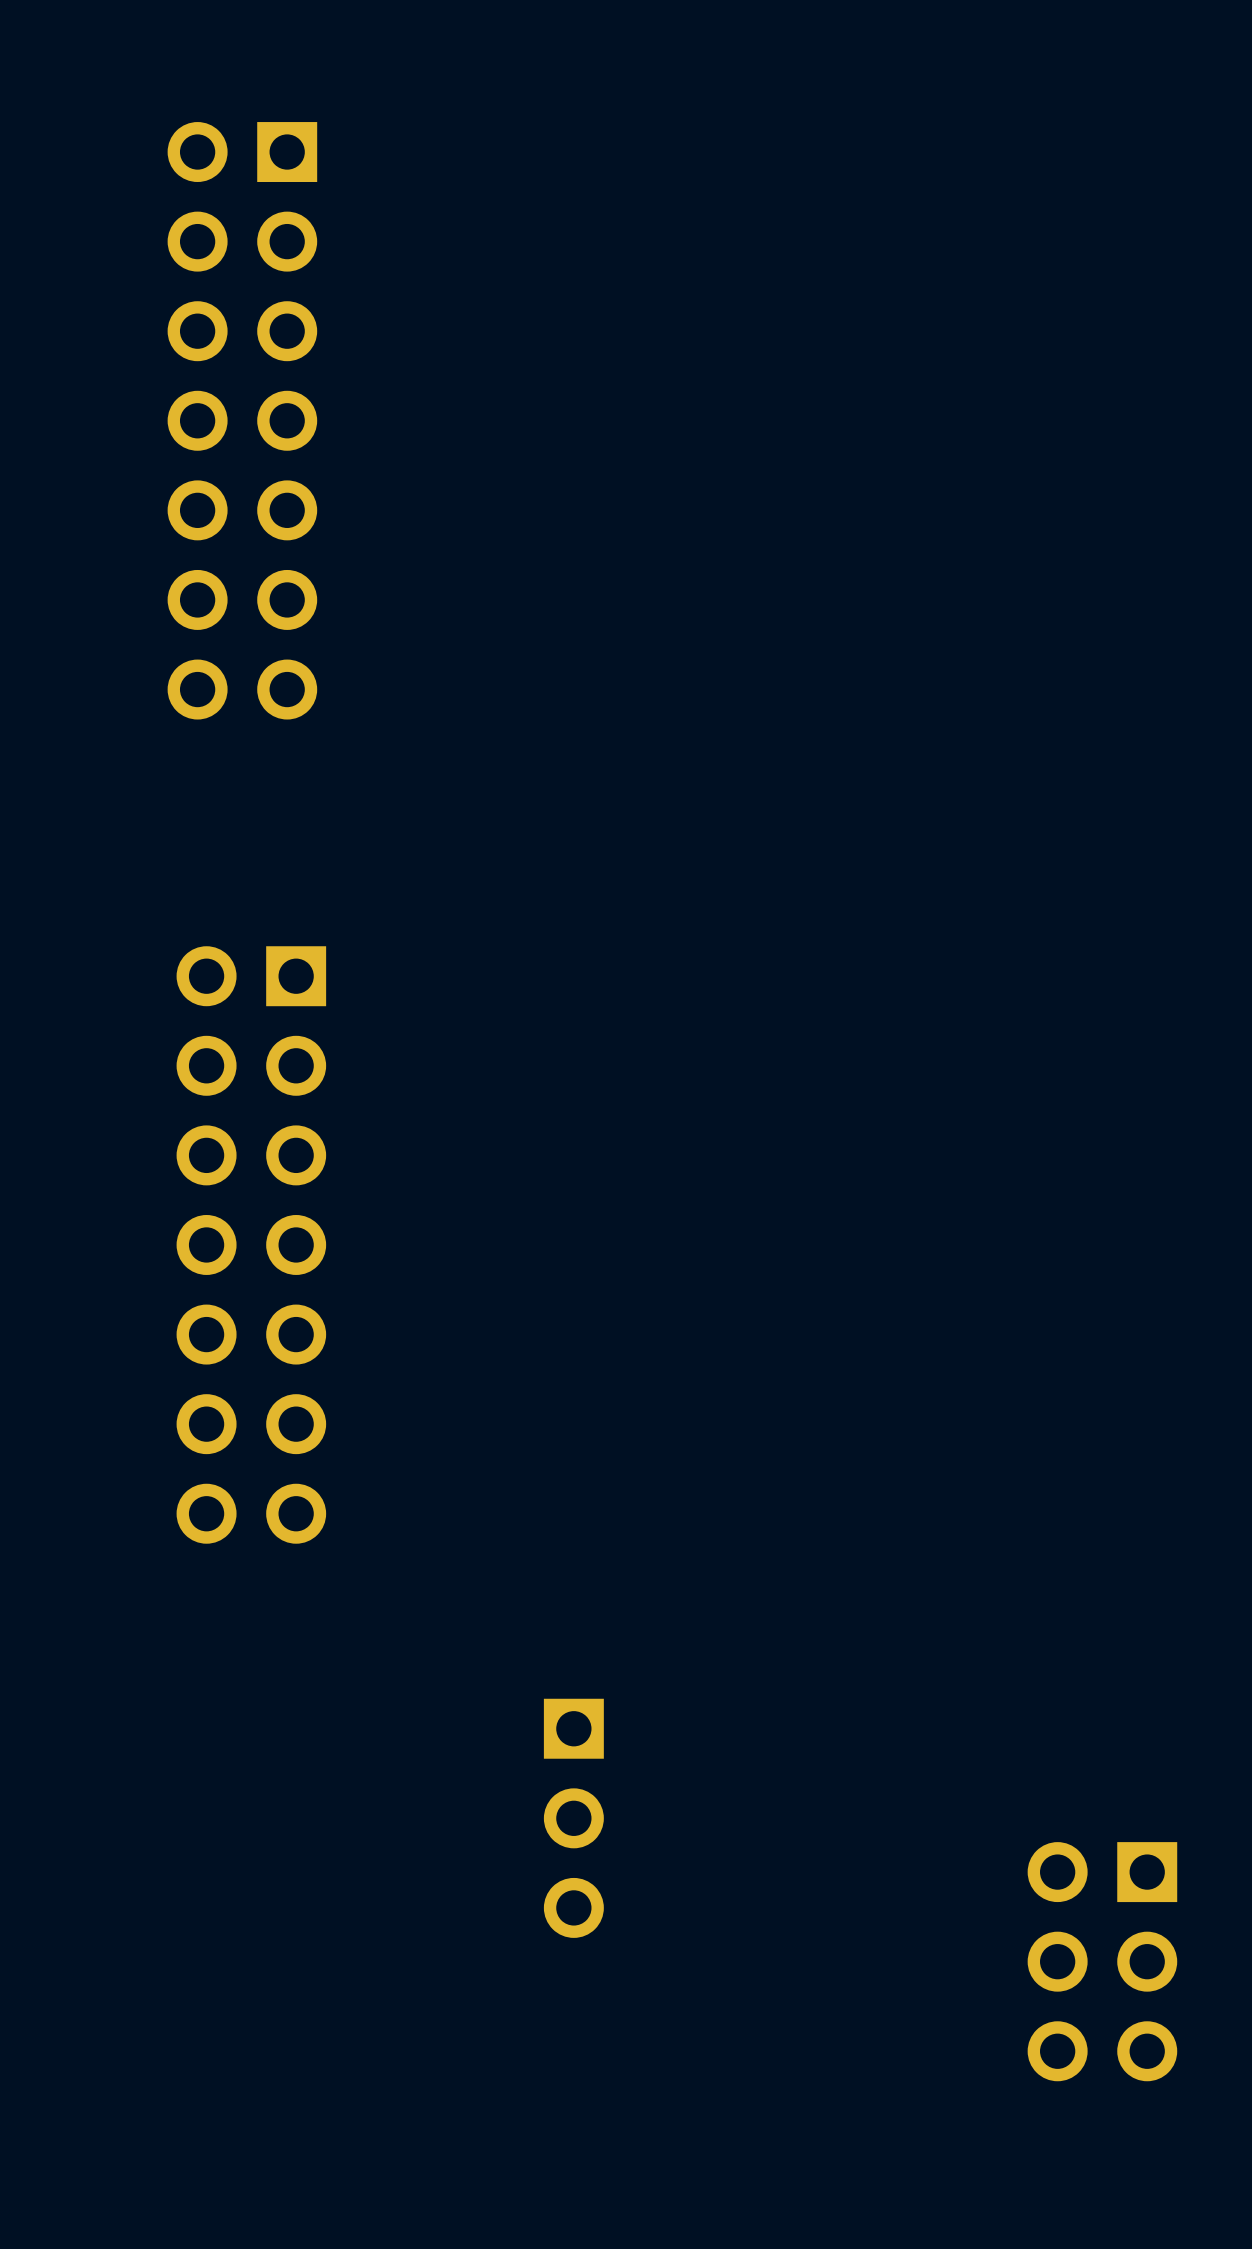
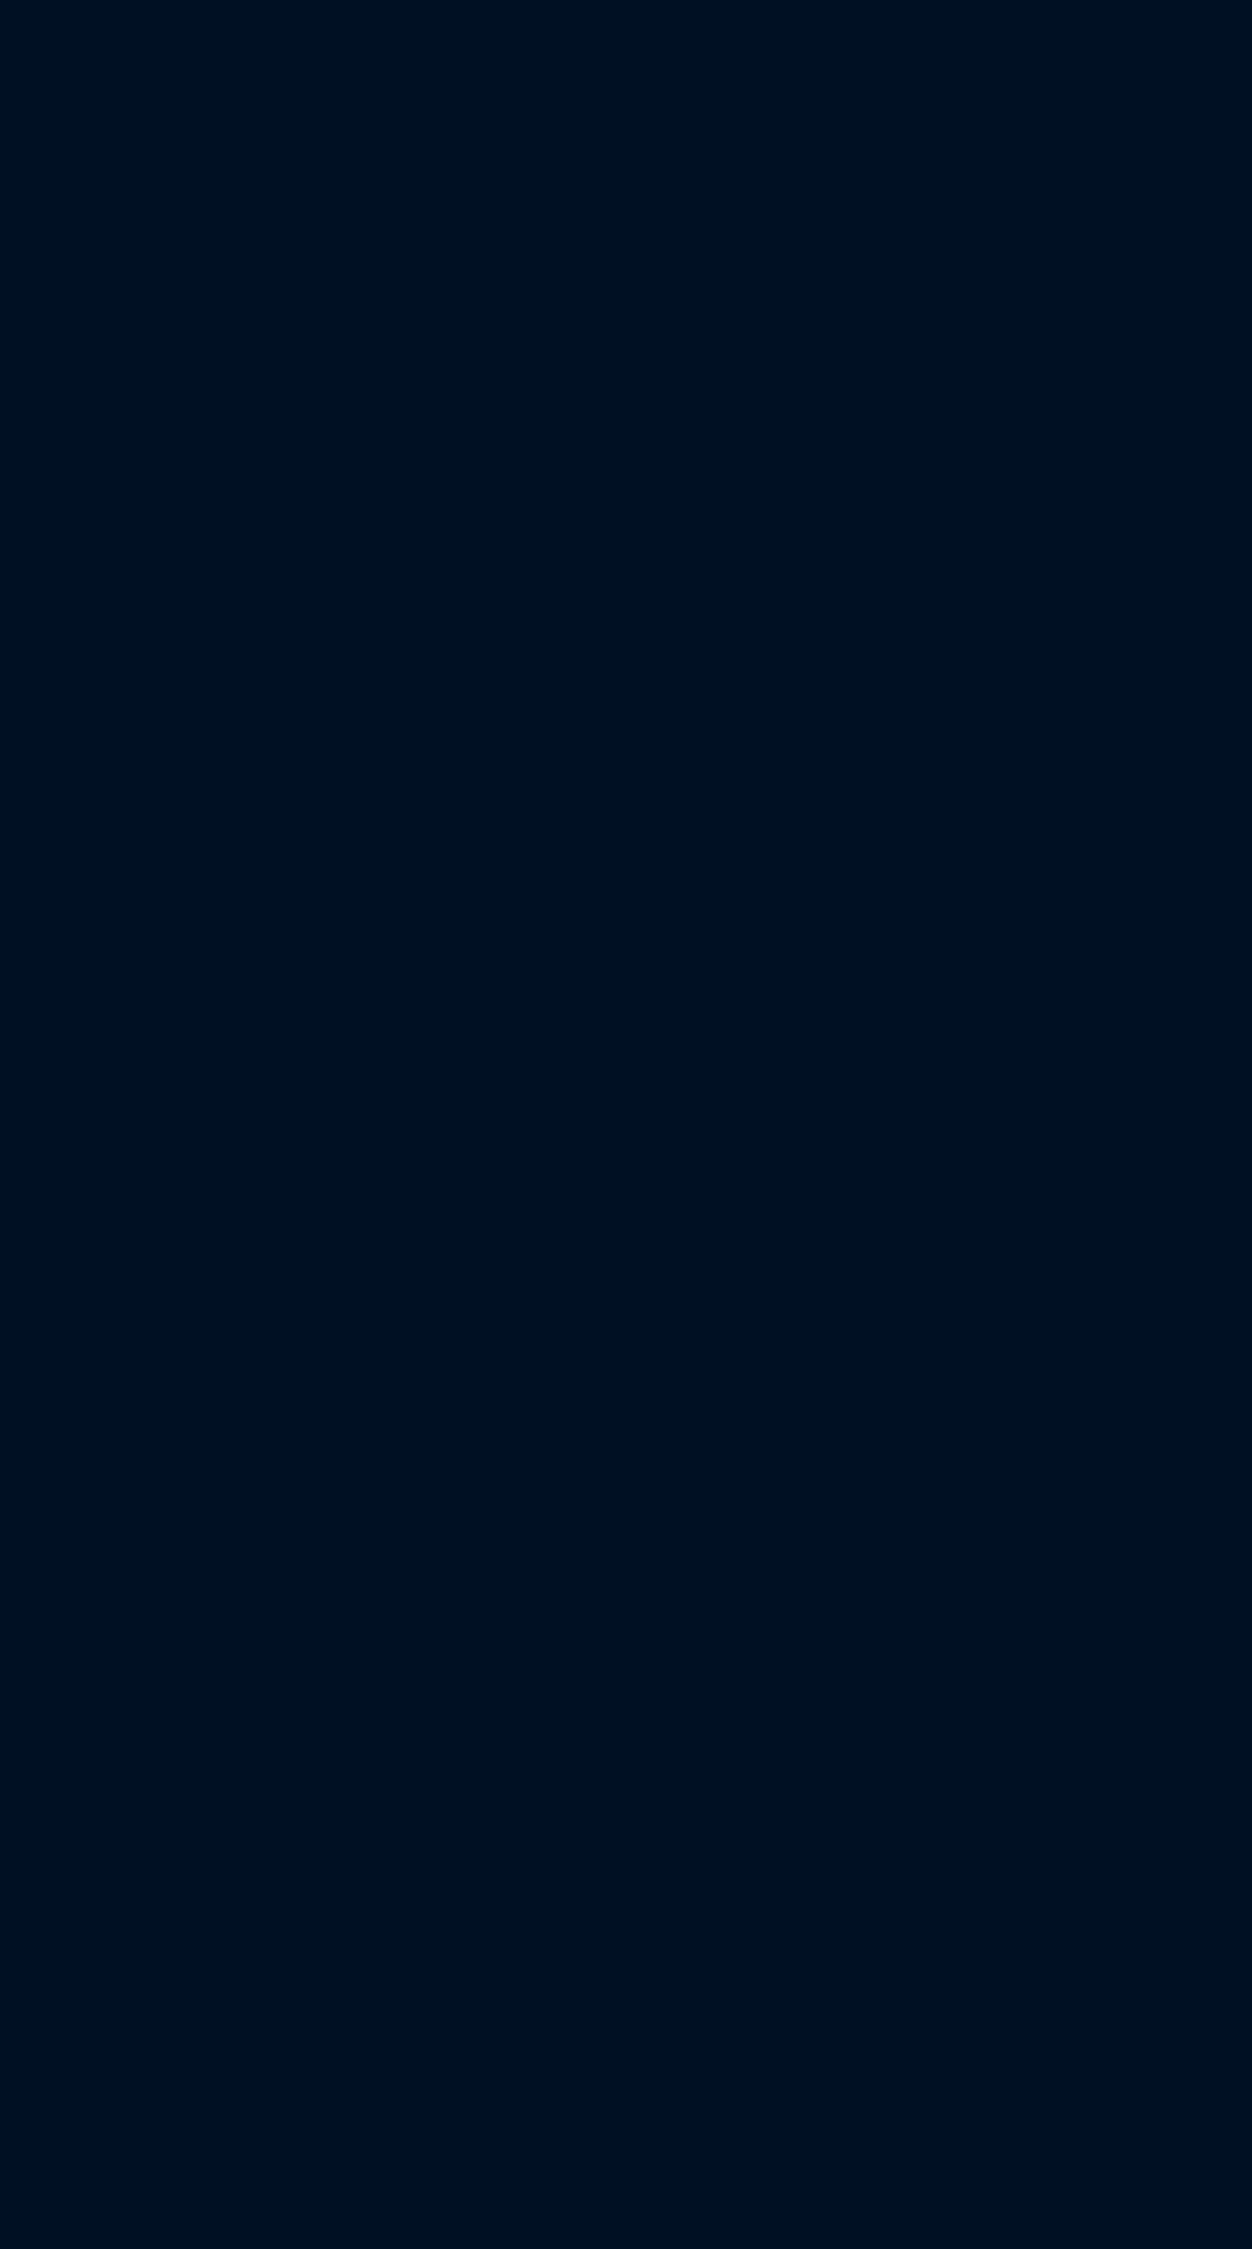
part: (242, 420) -> none
part: (251, 1244) -> none
part: (573, 1818) -> none
part: (1102, 1961) -> none

